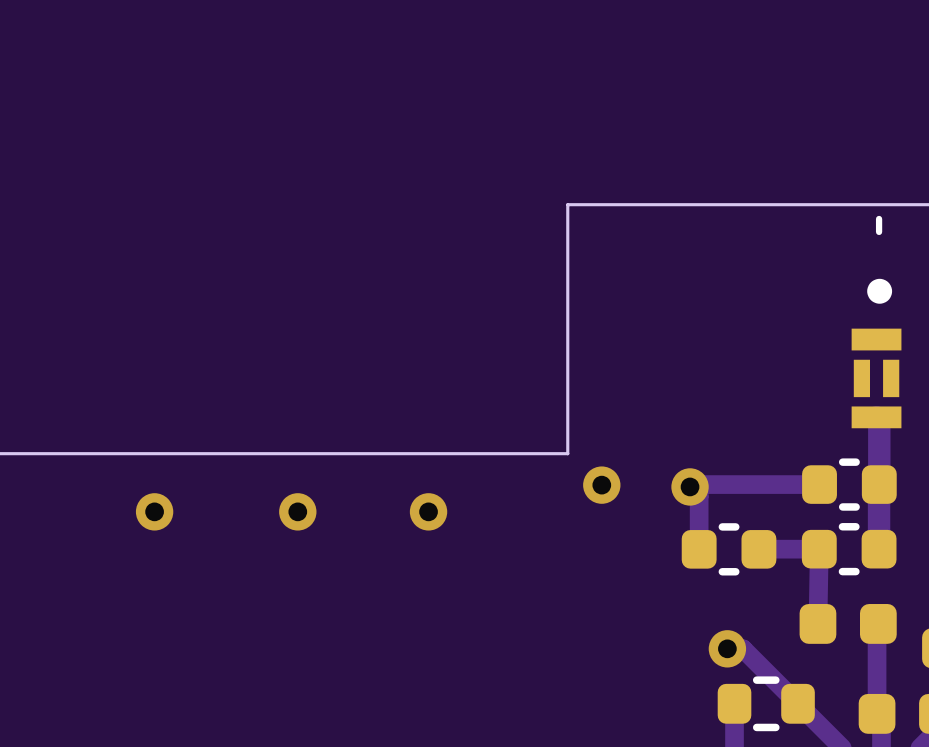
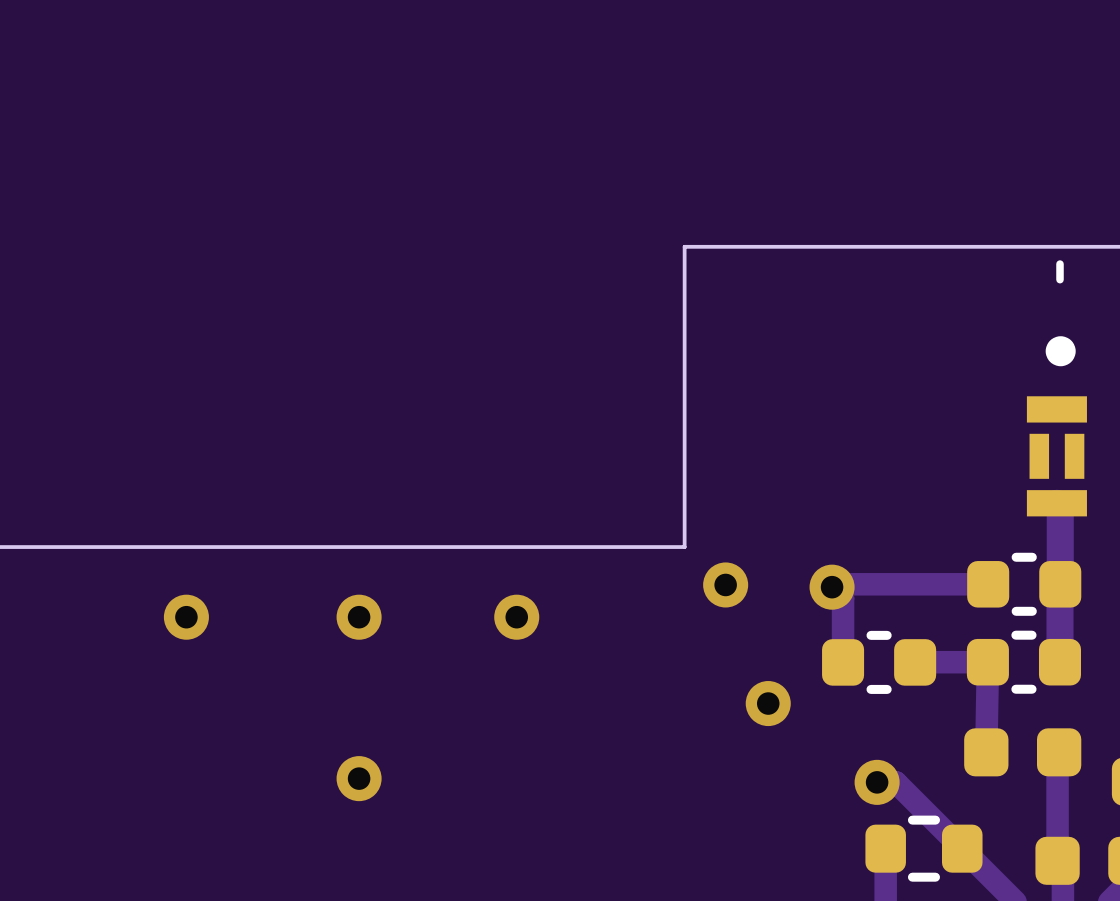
via: none -> (768, 703)
via: none -> (359, 778)

